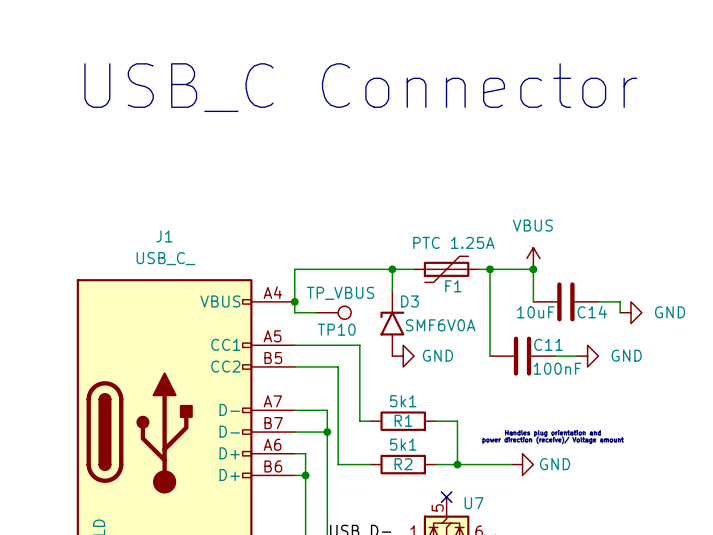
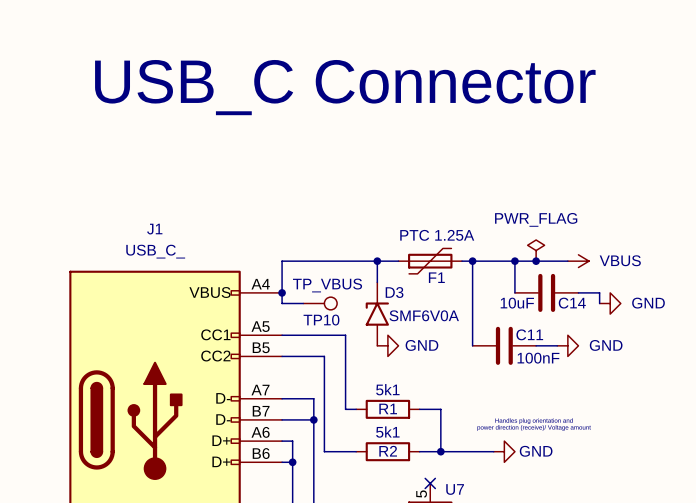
power symbol rotation: 0° (533, 258) -> 90° clockwise (578, 261)
power symbol position: VBUS (533, 258) -> VBUS (578, 261)
power symbol: none -> PWR_FLAG (536, 250)
wire: none -> (514, 261) (567, 261)
junction: none -> (536, 261)

